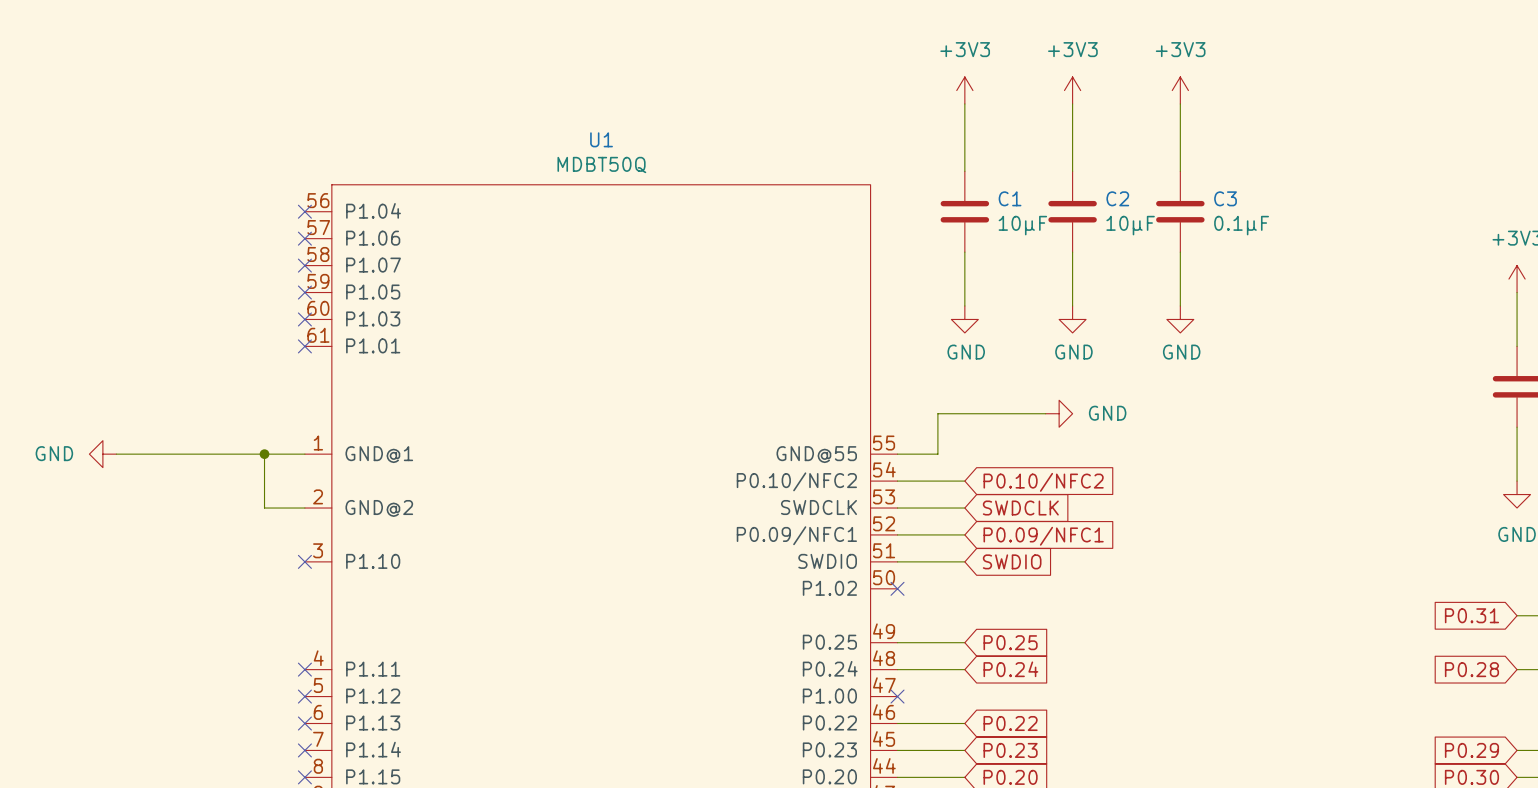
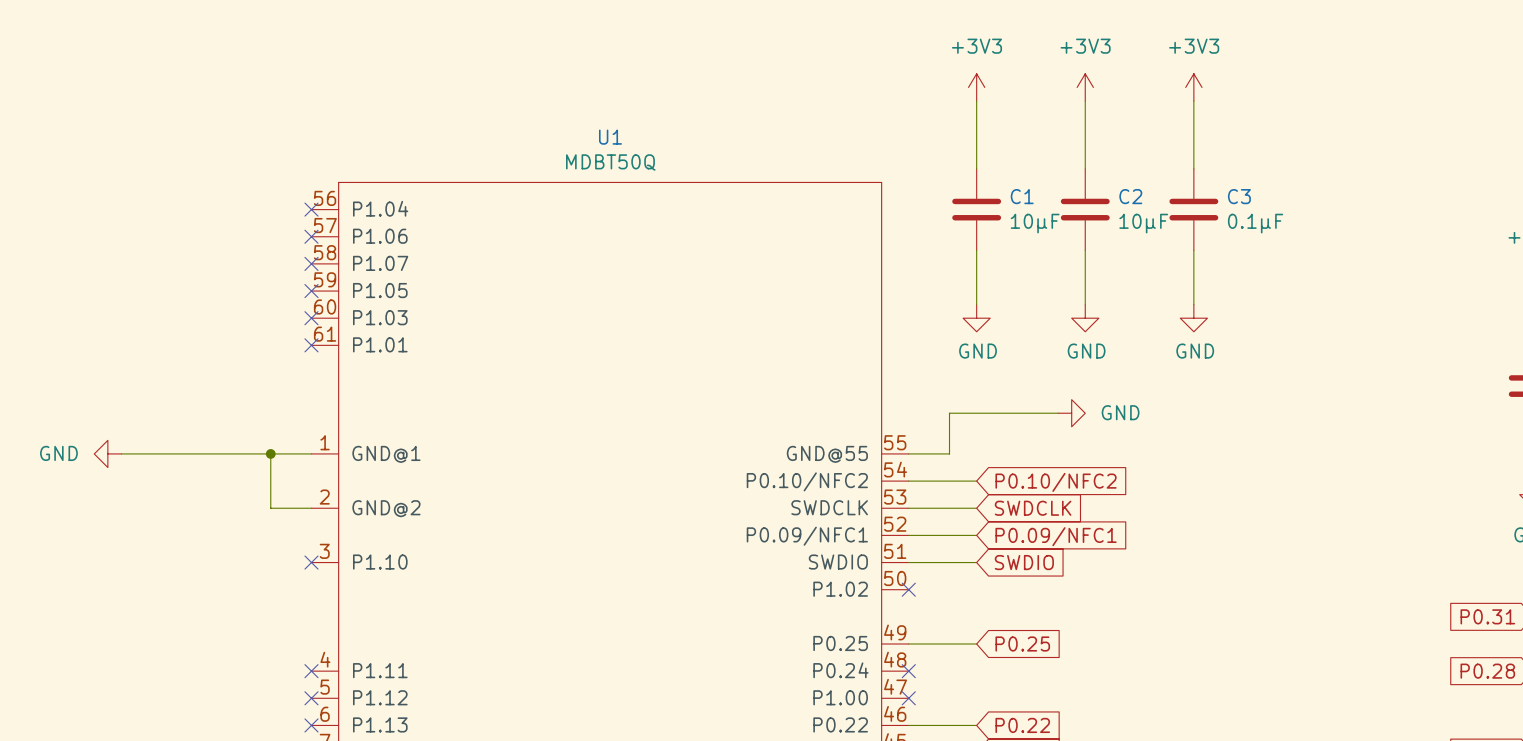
wire: (897, 669) (964, 669) -> none
no-connect mark: none -> (908, 671)
global label: P0.24 (1010, 669) -> none

